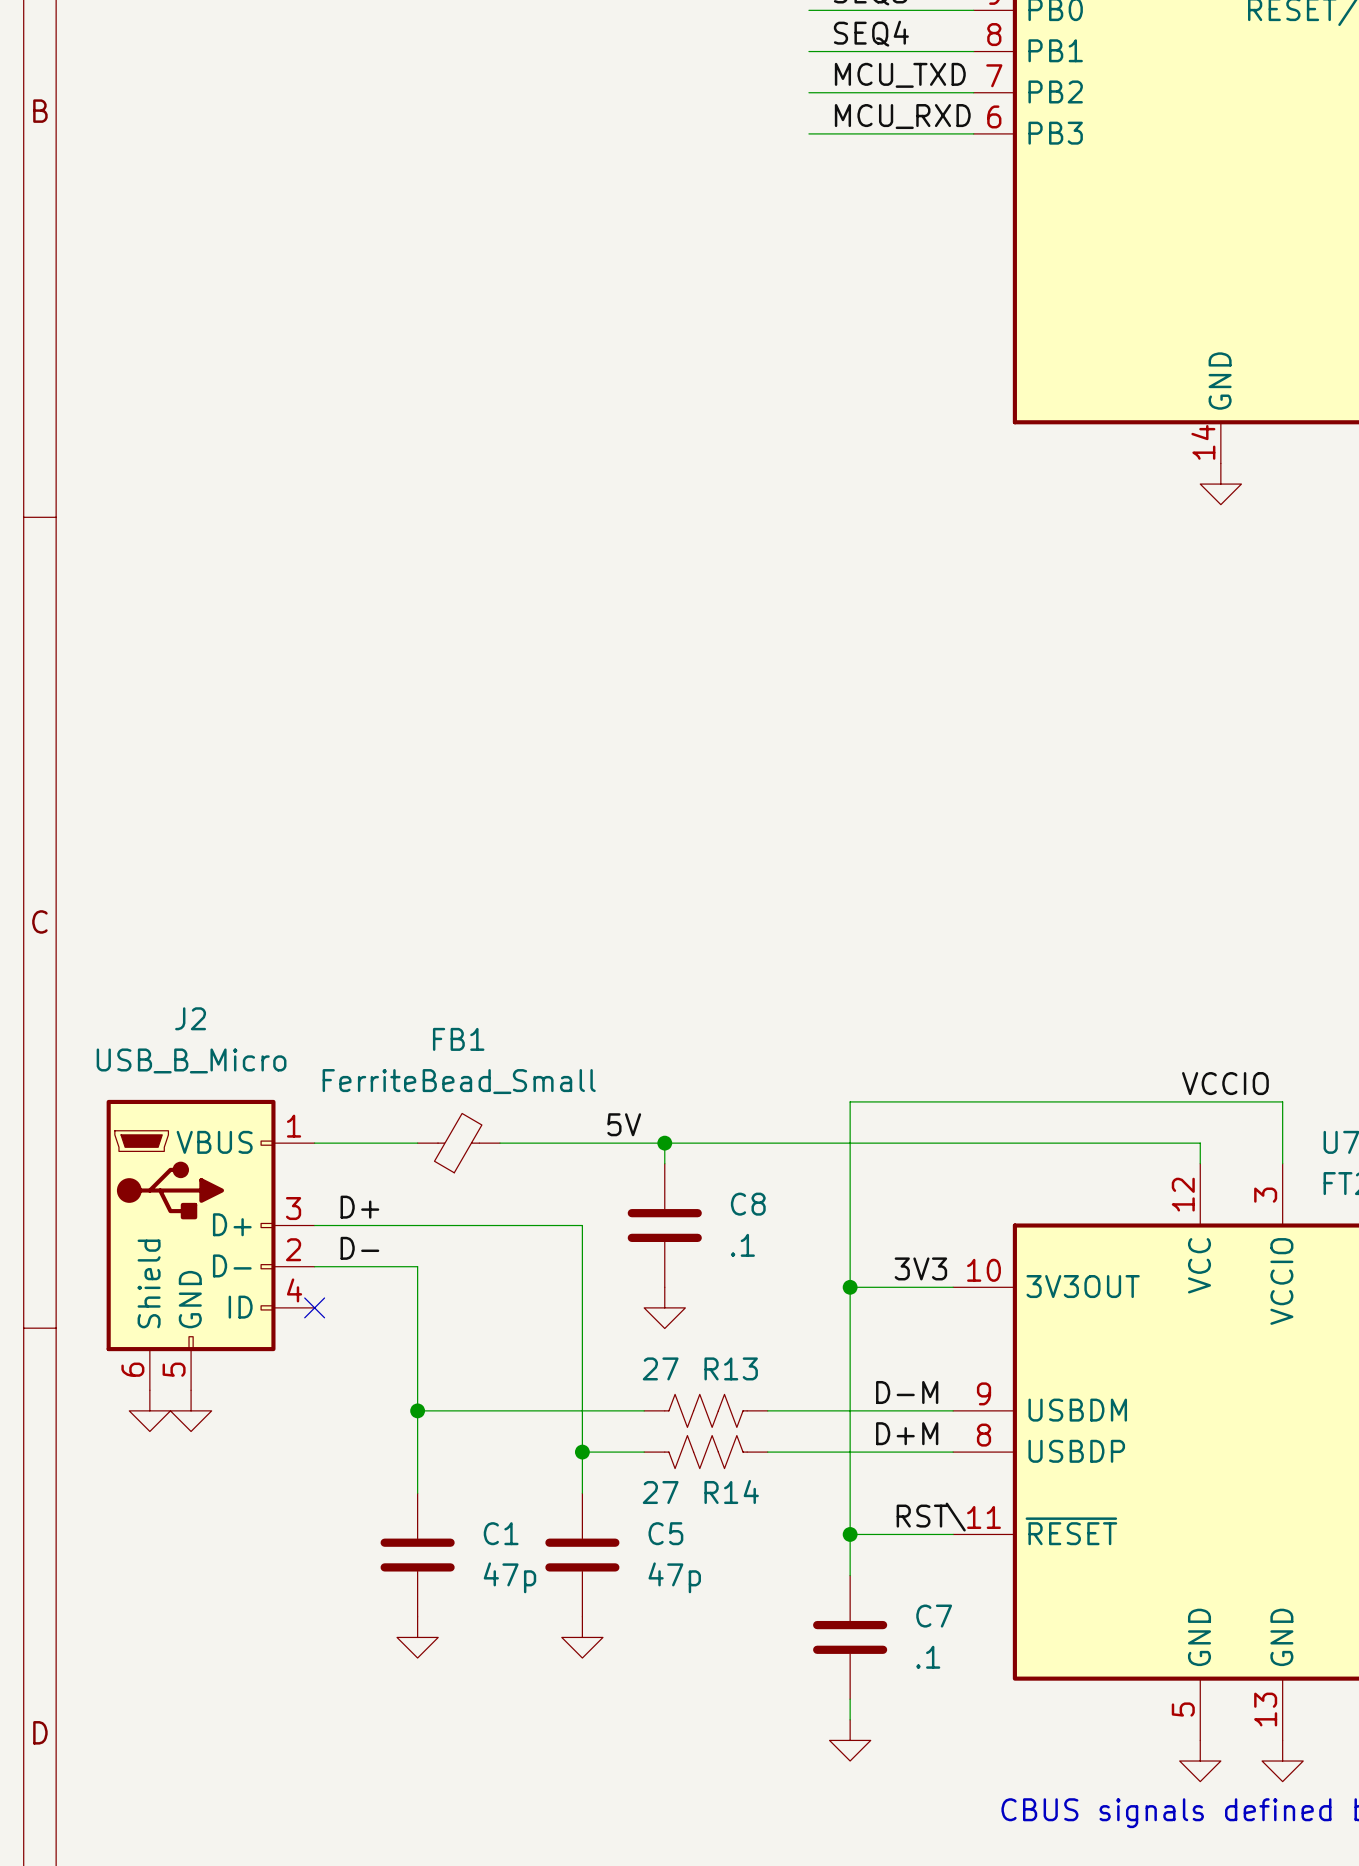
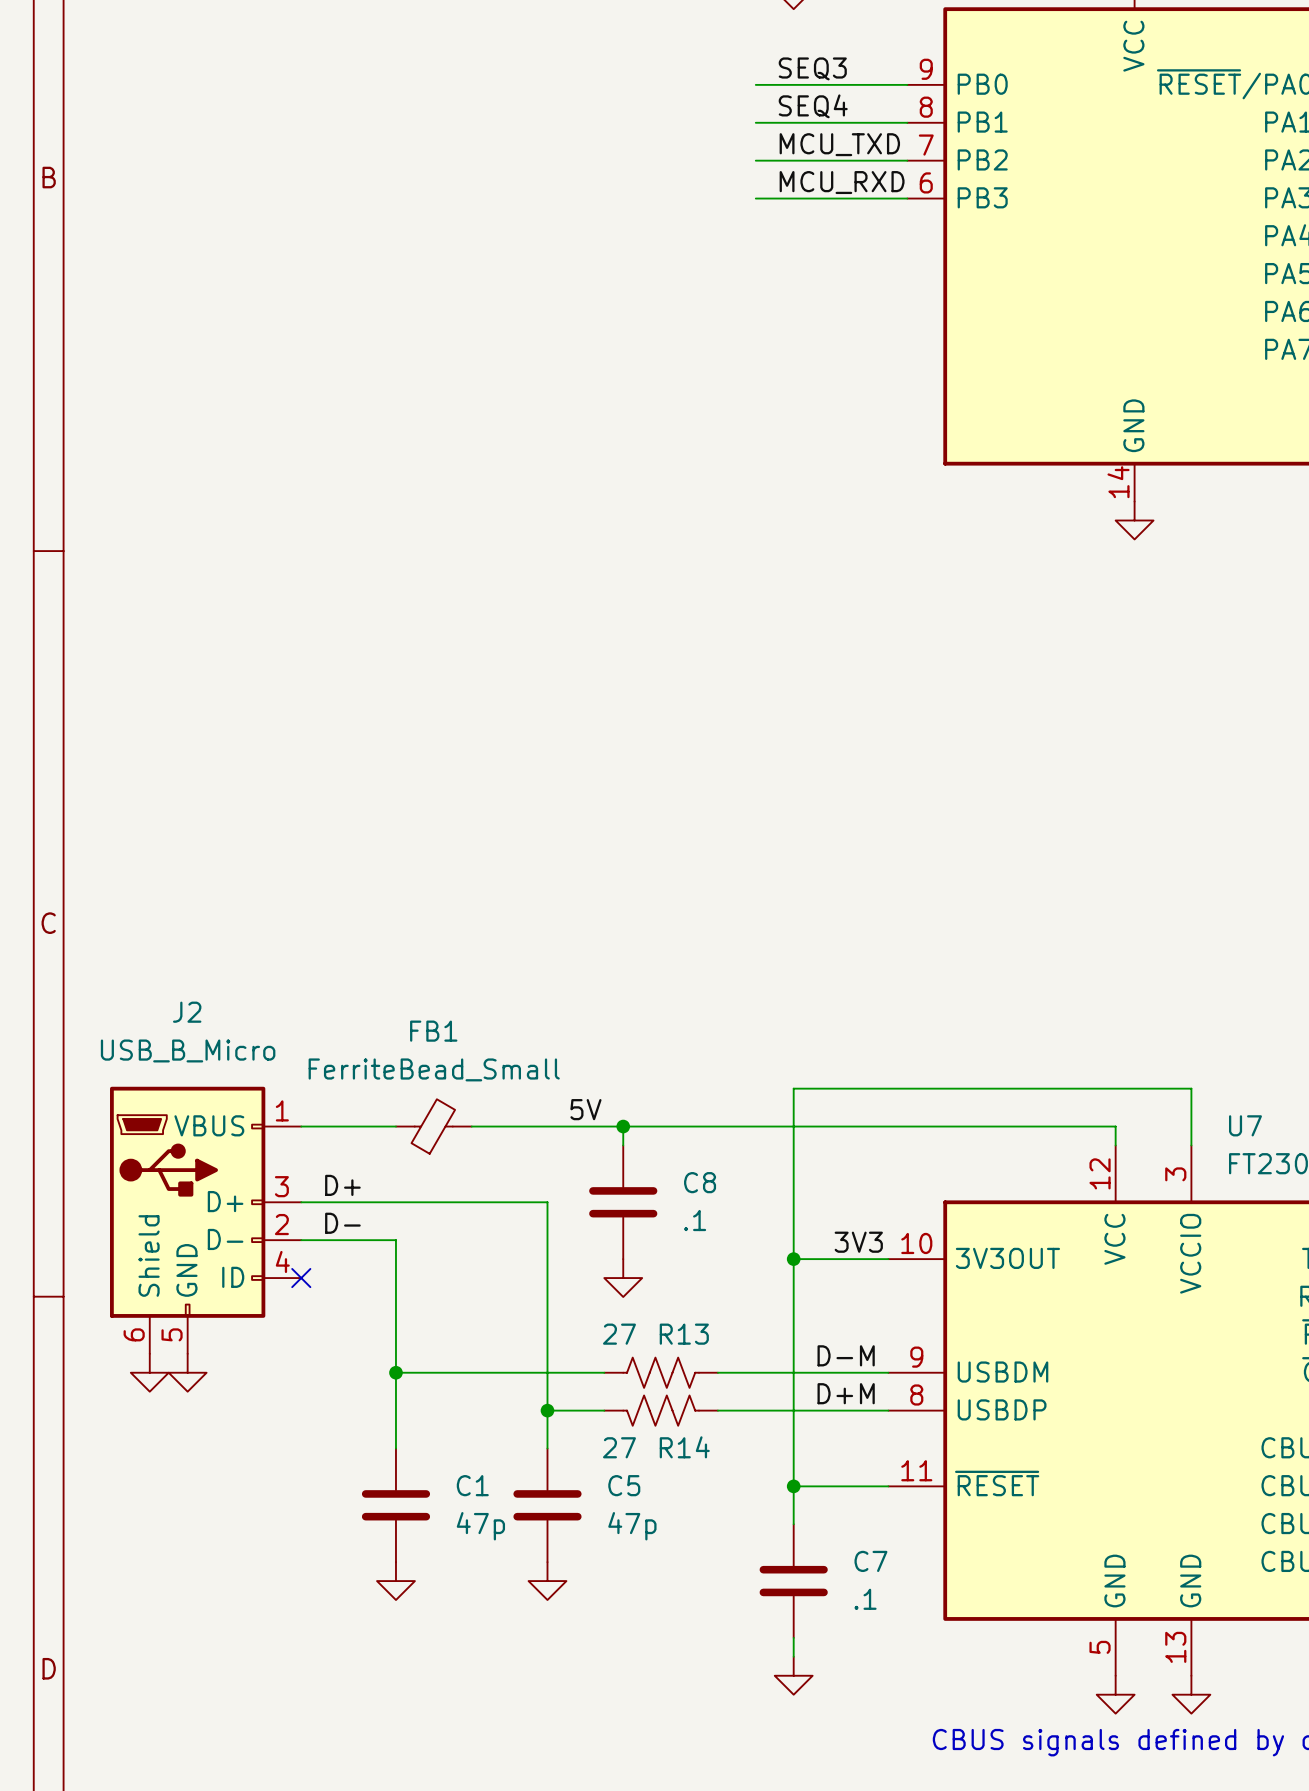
label: VCCIO (1225, 1083) -> none
label: RST\ (931, 1517) -> none

